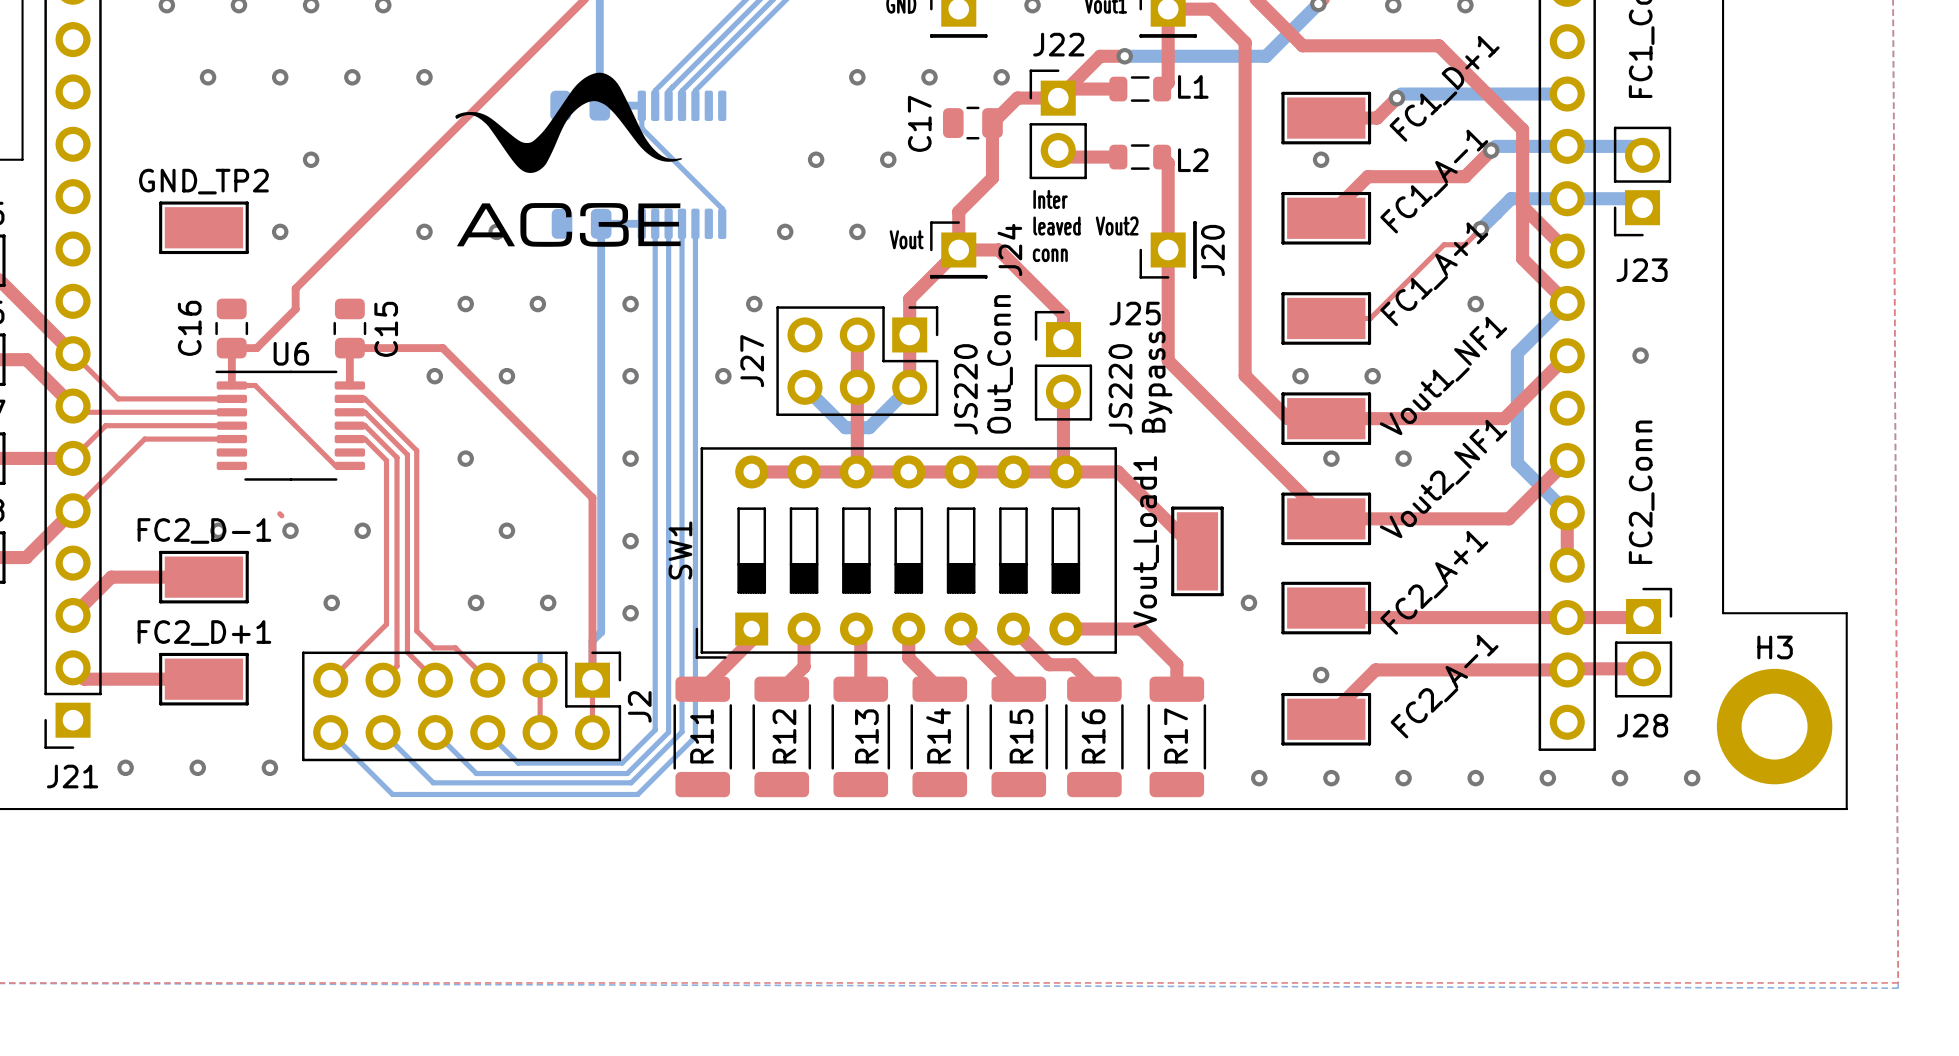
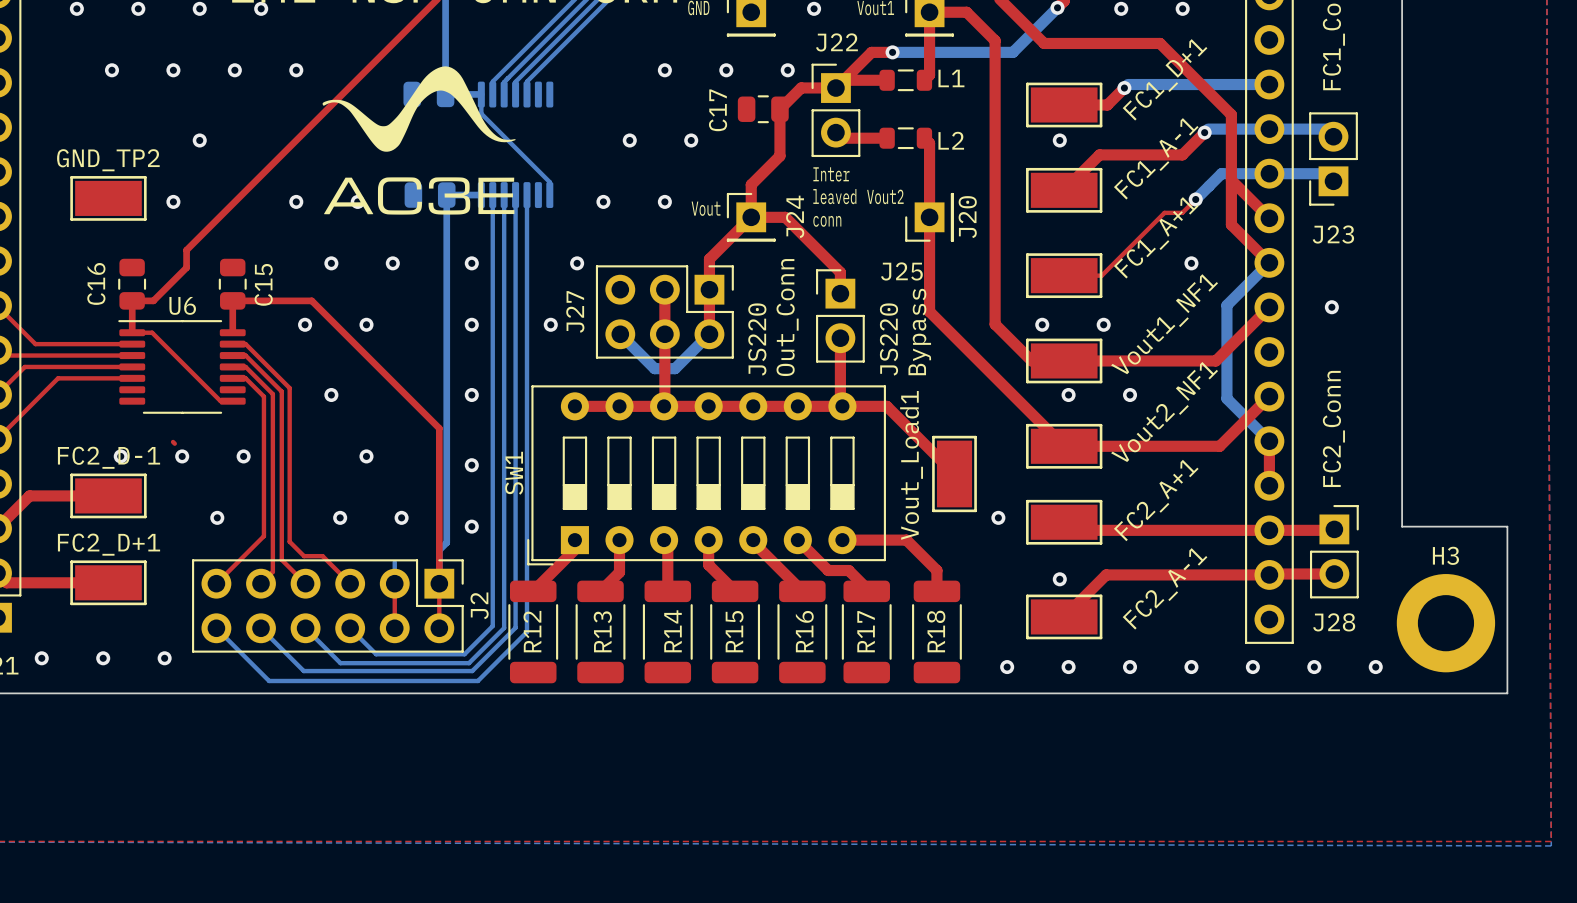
R14 name: R14 (938, 735) -> R15 (734, 631)
R17 name: R17 (1176, 735) -> R18 (936, 631)
R11 name: R11 (701, 736) -> R12 (532, 631)
R12 name: R12 (784, 736) -> R13 (602, 631)
R13 name: R13 (866, 736) -> R14 (673, 631)
R15 name: R15 (1021, 736) -> R16 (804, 631)
R16 name: R16 (1093, 736) -> R17 (866, 631)

